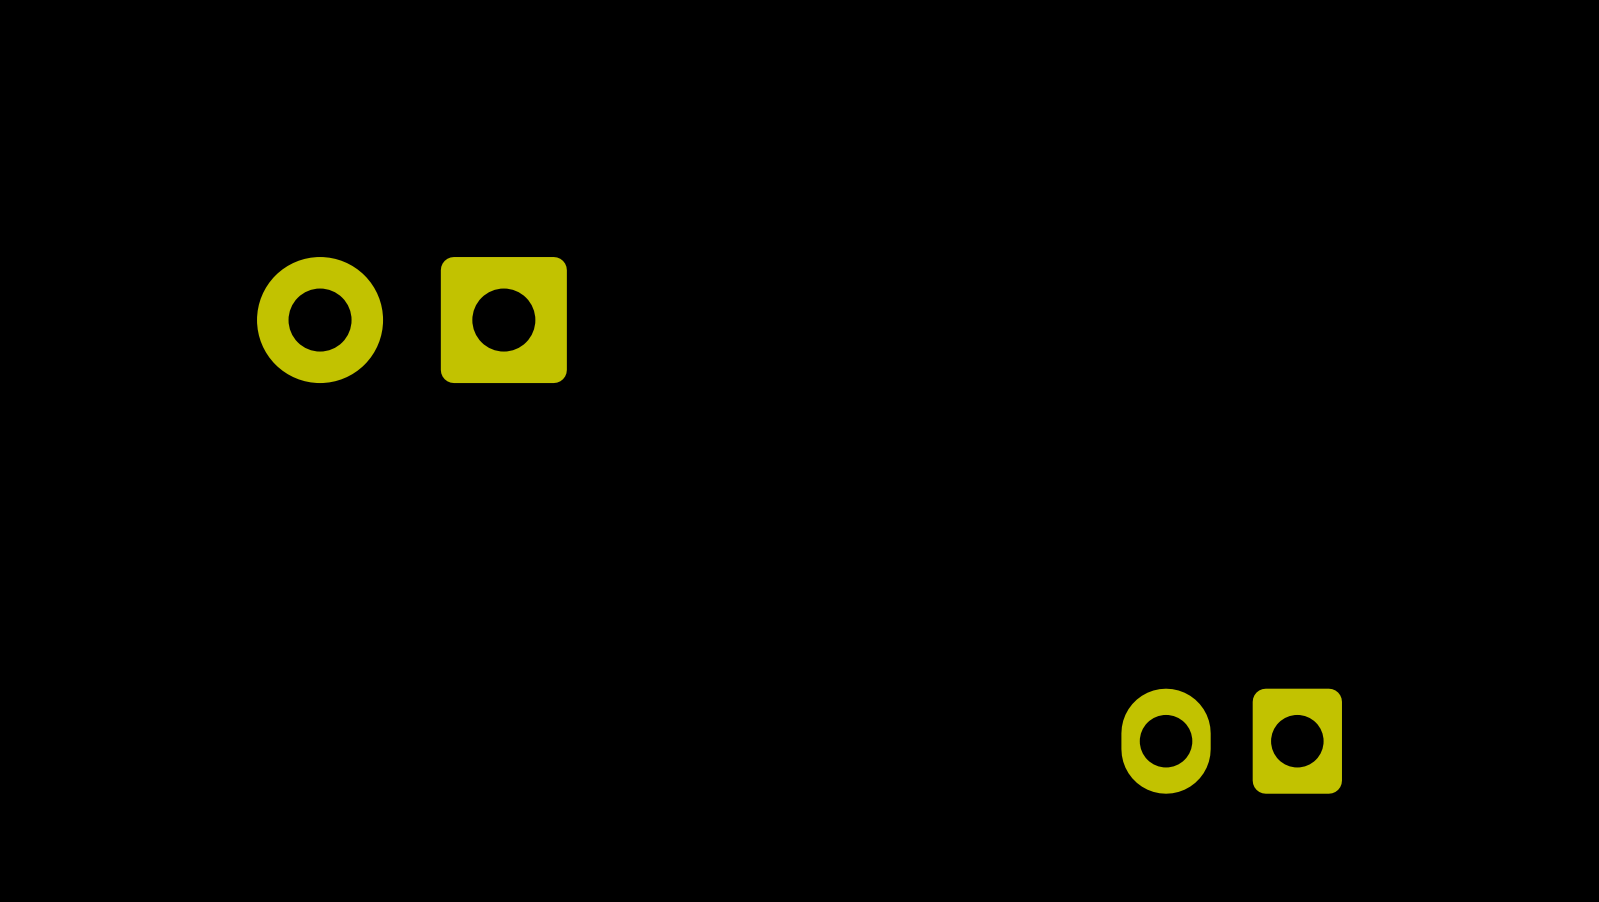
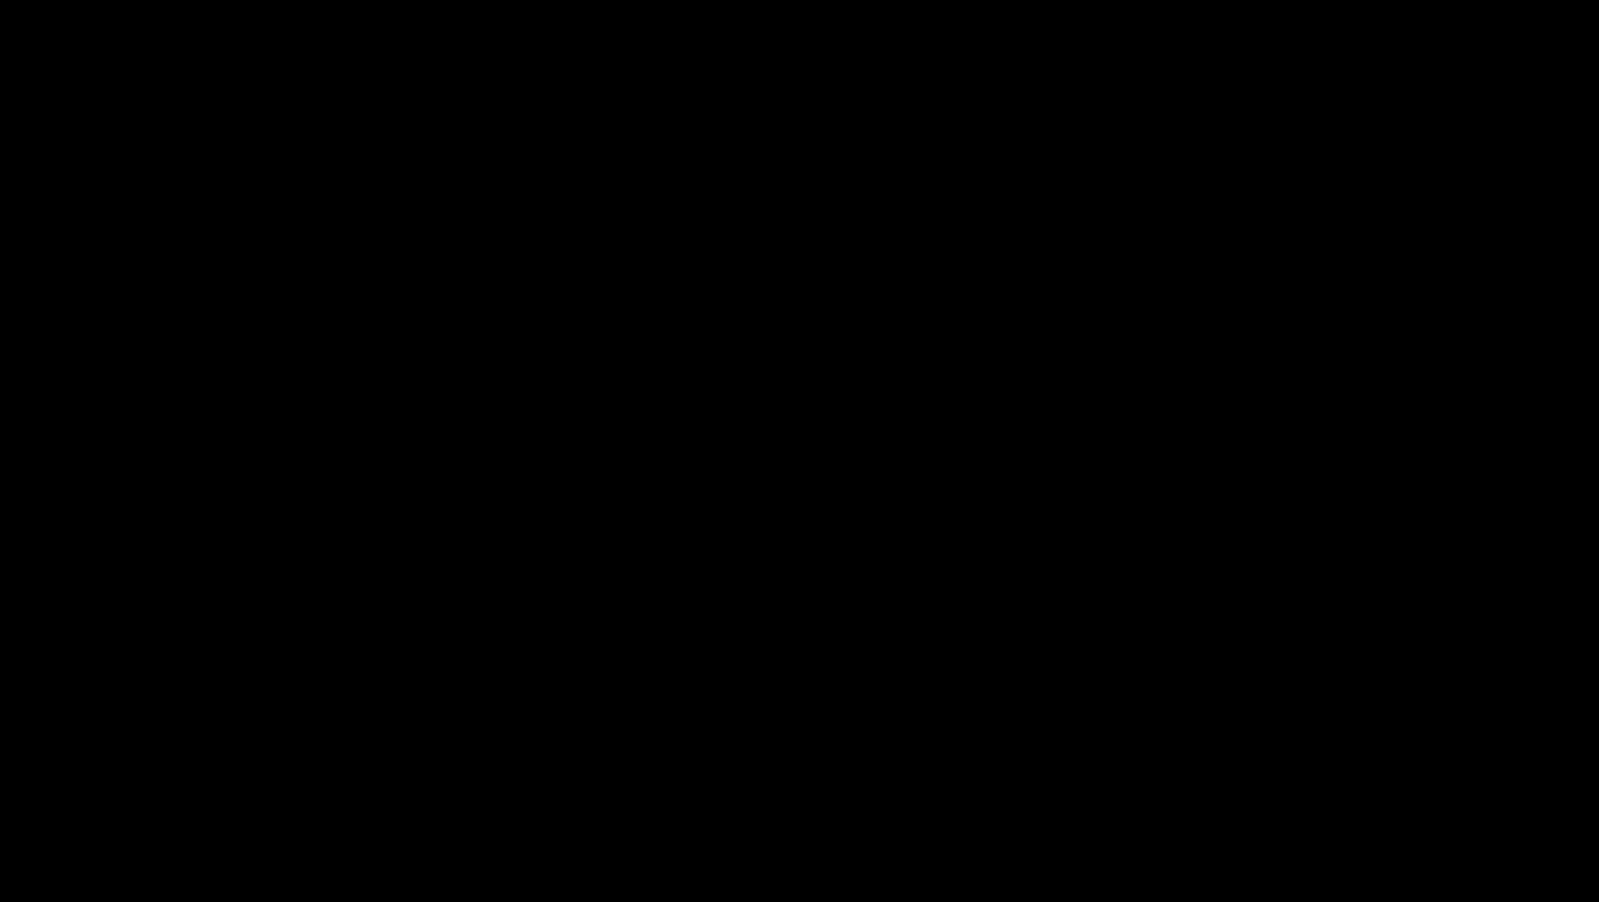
part: (411, 320) -> none
part: (1231, 741) -> none

